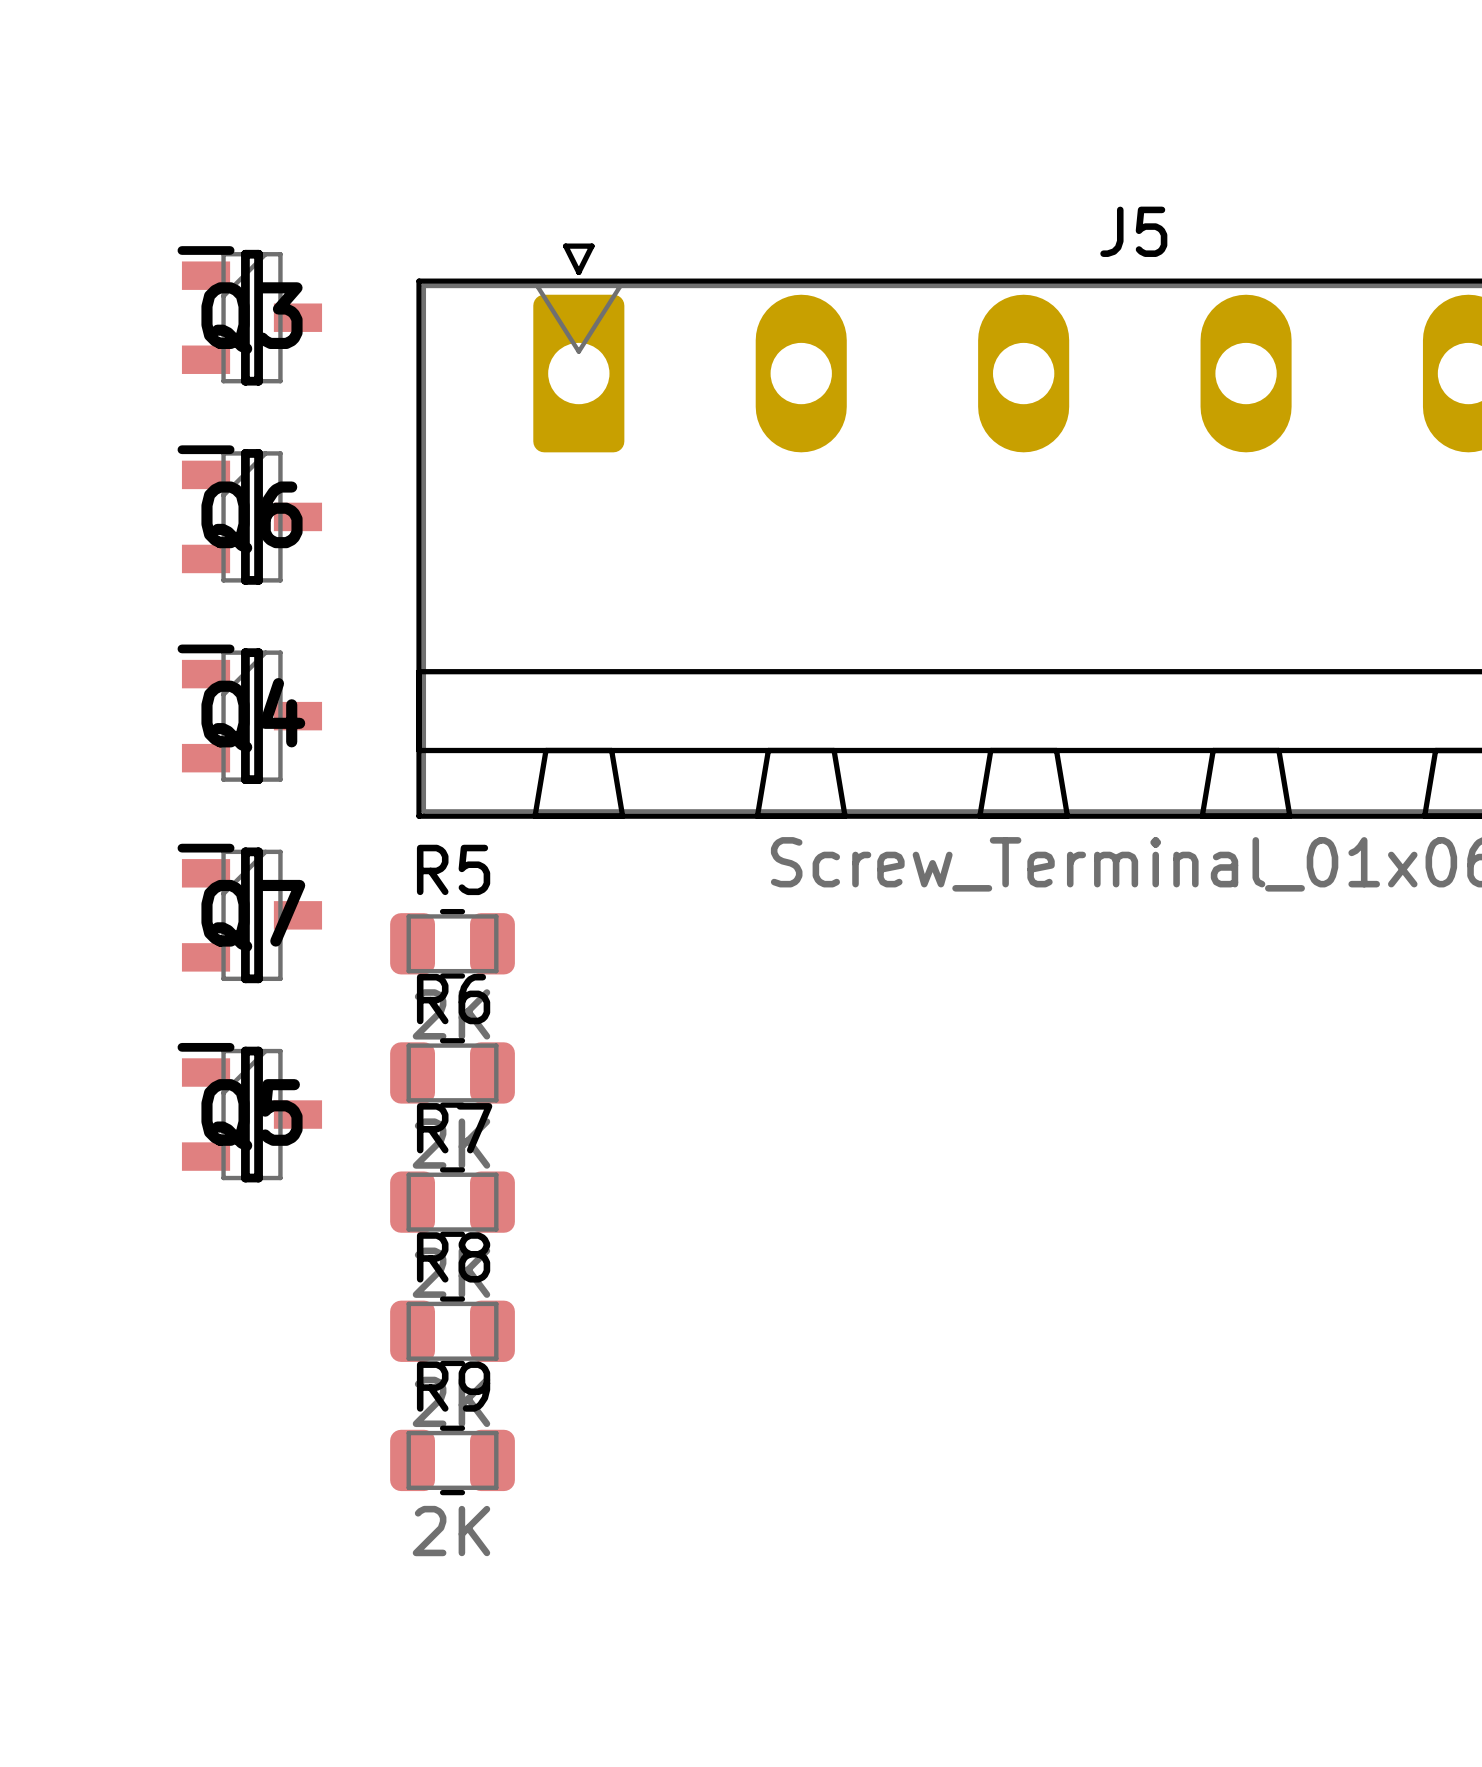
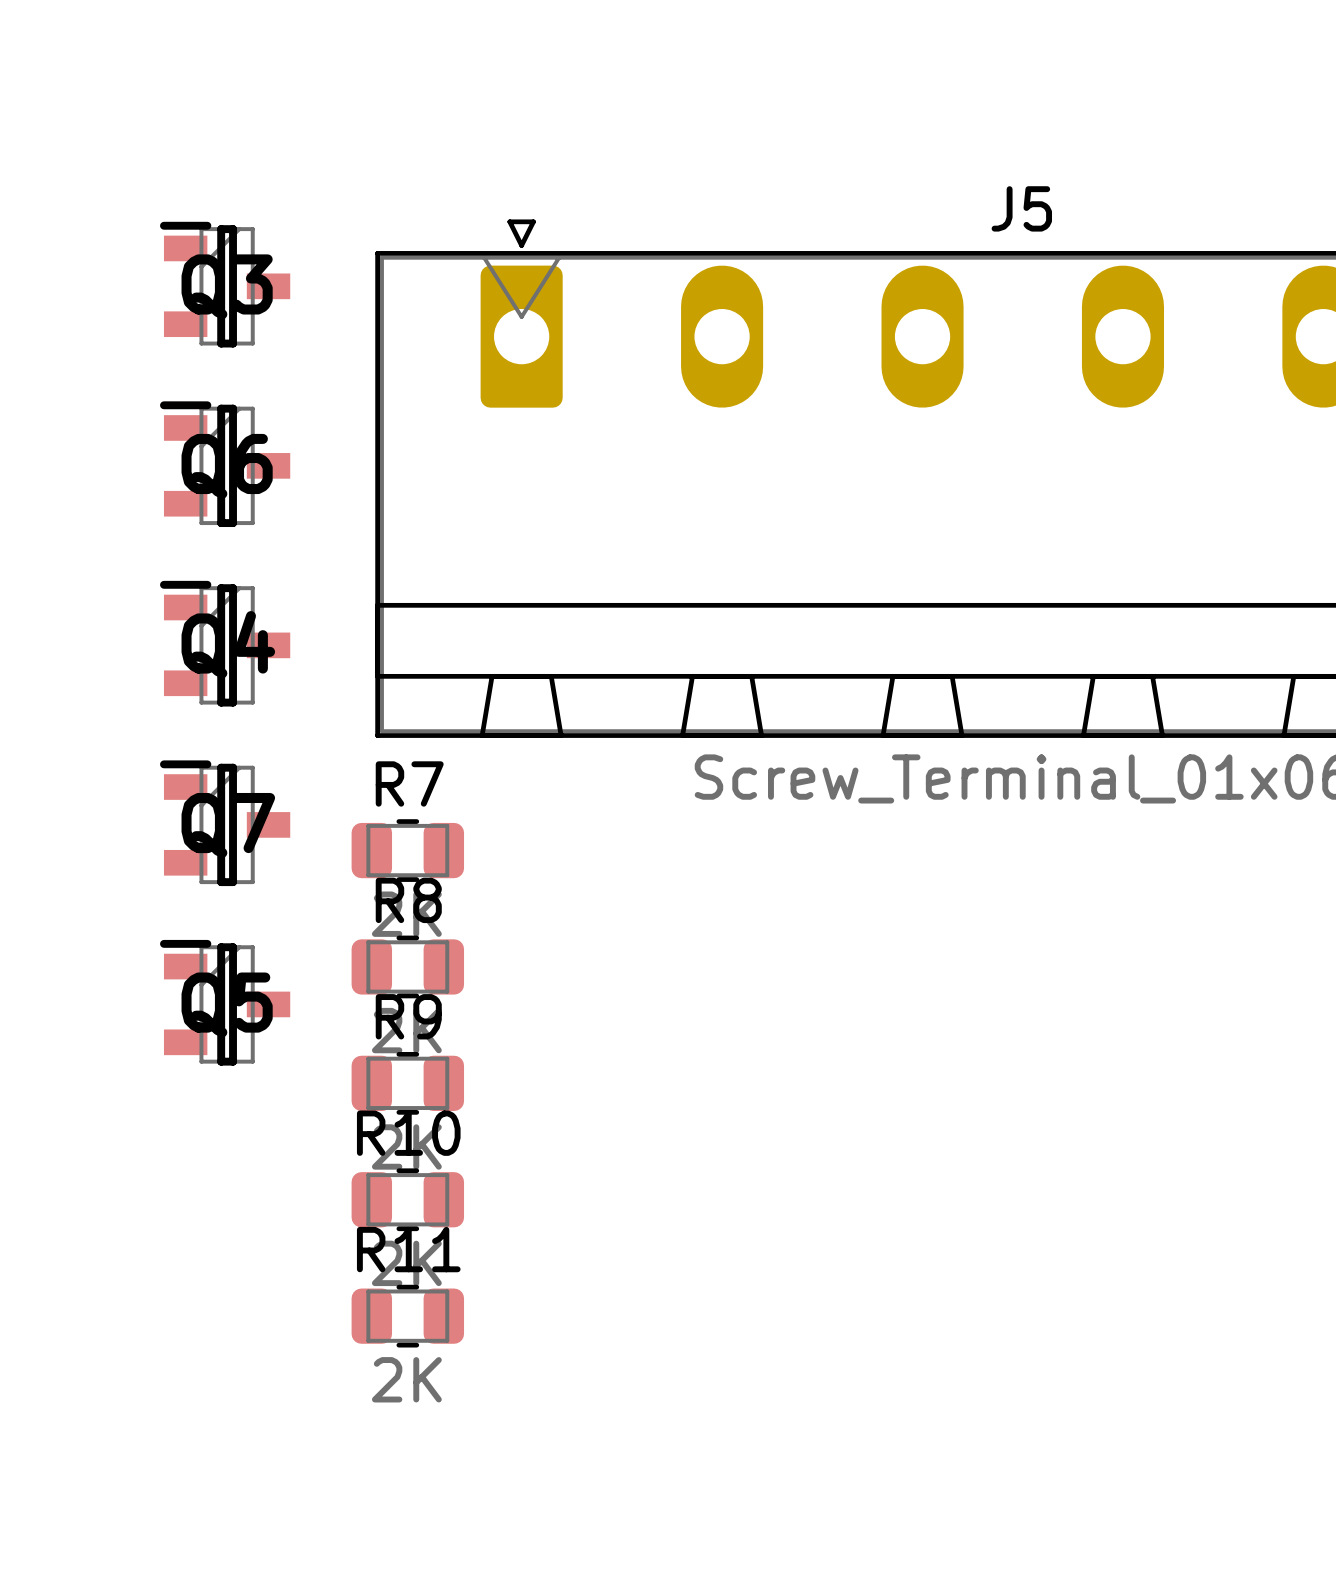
R5 name: R5 (453, 869) -> R7 (409, 783)
R6 name: R6 (453, 999) -> R8 (408, 900)
R7 name: R7 (454, 1128) -> R9 (408, 1016)
R8 name: R8 (453, 1257) -> R10 (408, 1133)
R9 name: R9 (453, 1386) -> R11 (408, 1249)

